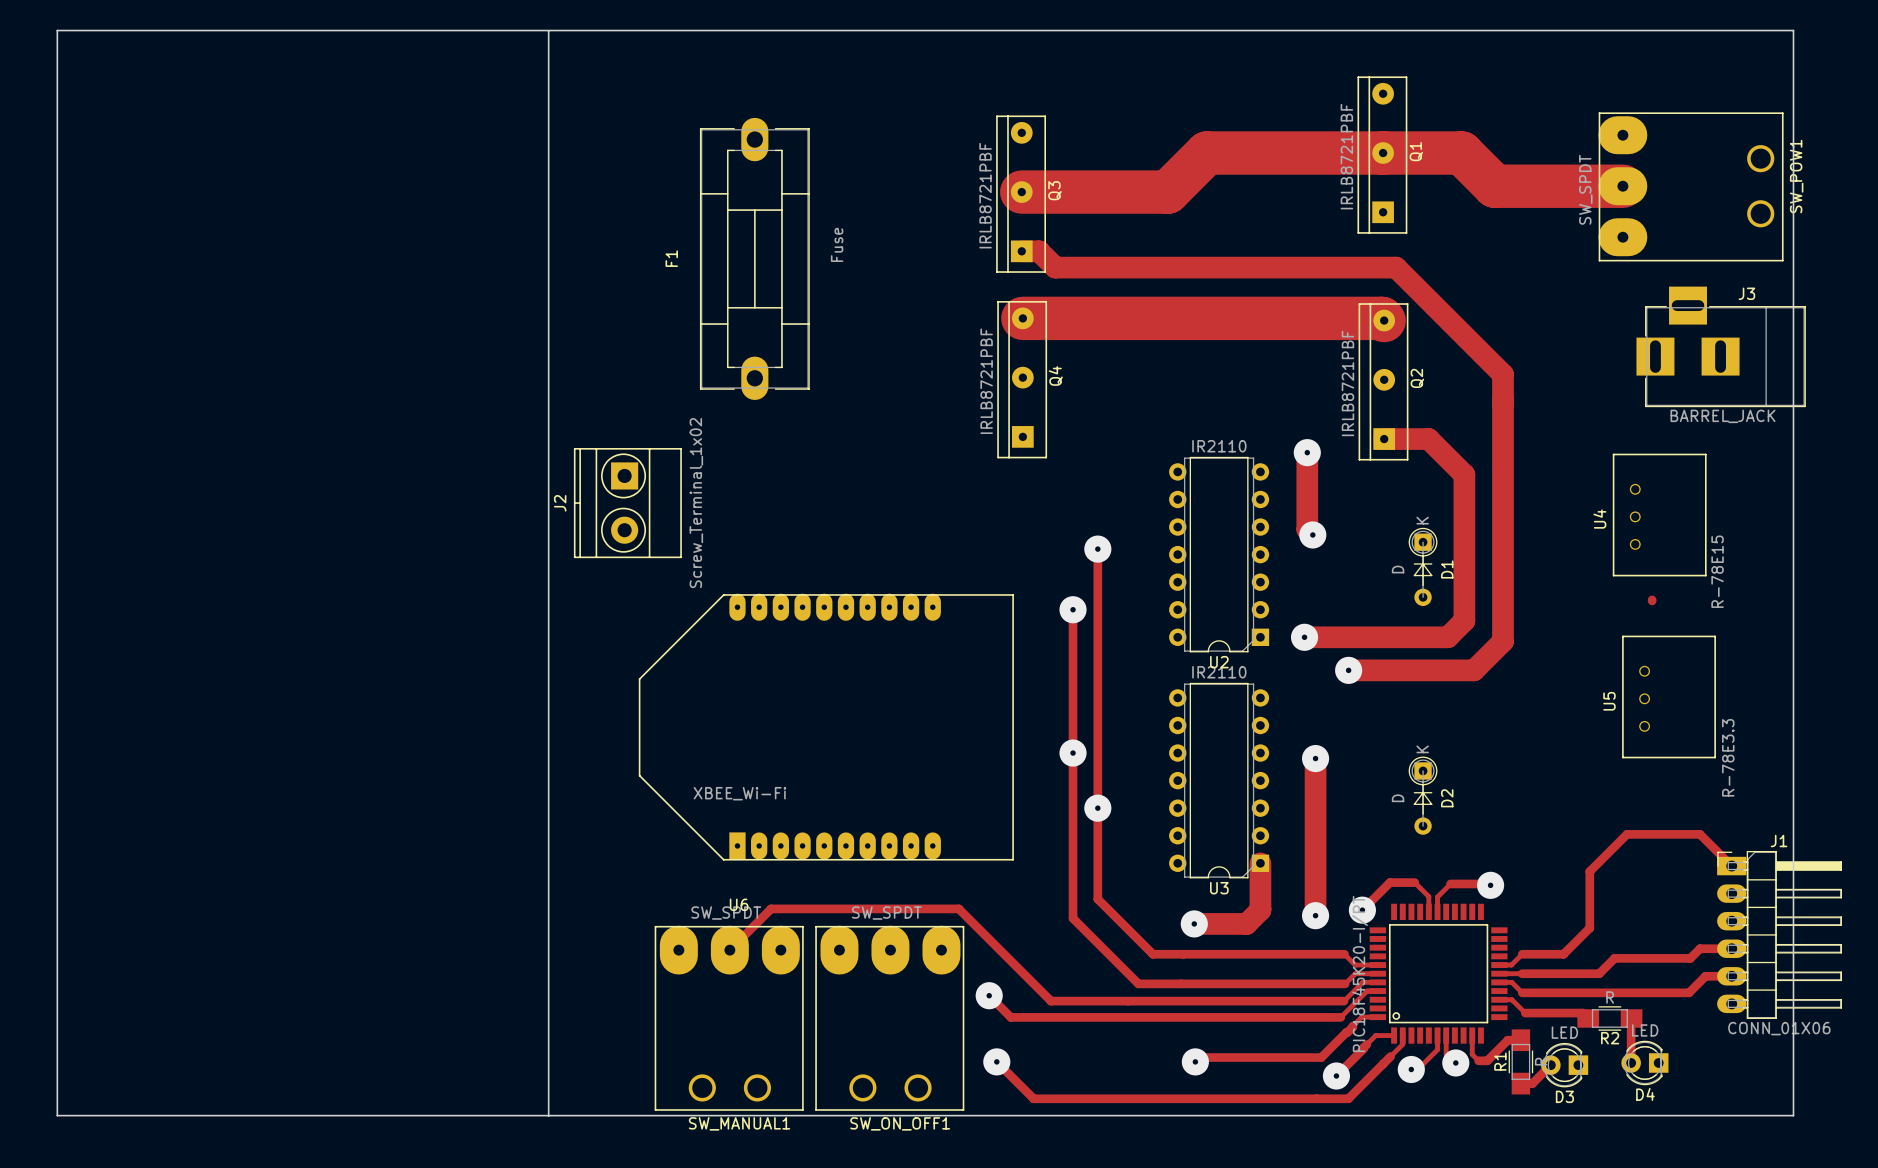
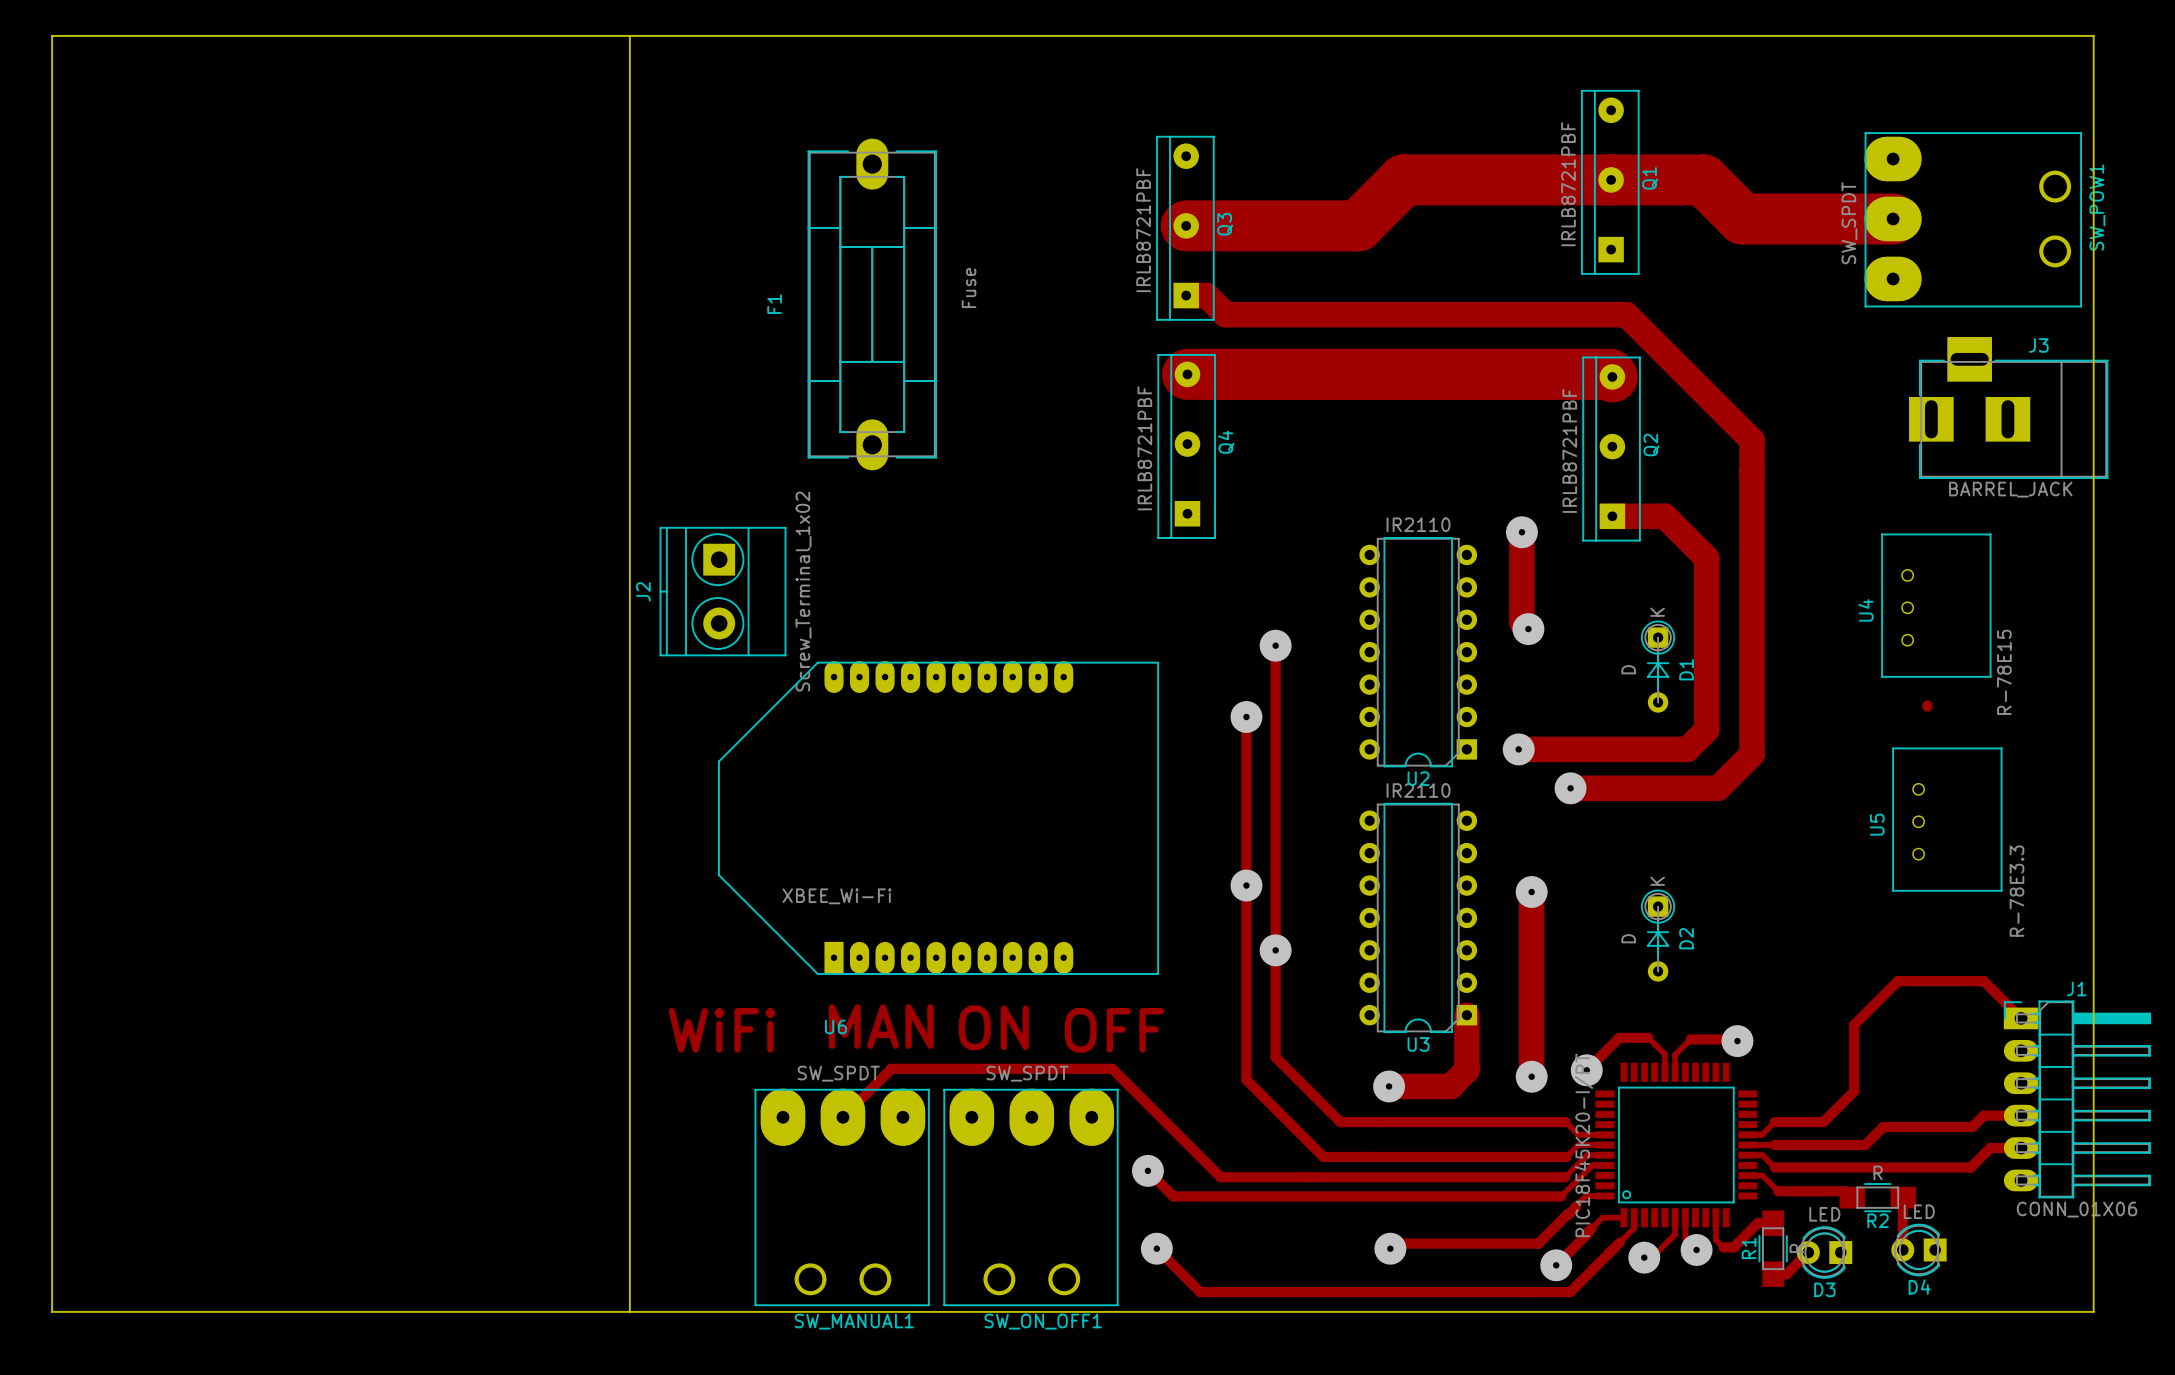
U6 position: (826, 727) -> (938, 818)
text: none -> MAN (881, 1026)
text: none -> ON (993, 1027)
text: none -> WiFi (722, 1030)
text: none -> OFF (1114, 1030)

